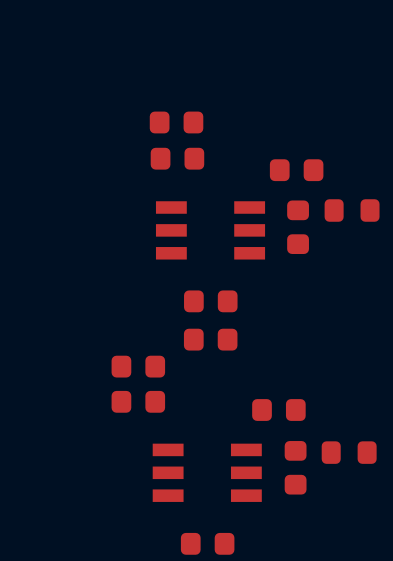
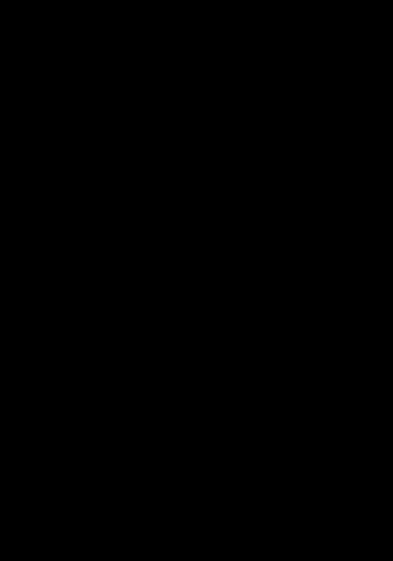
part: (176, 122) -> none
part: (177, 158) -> none
part: (296, 170) -> none
part: (352, 210) -> none
part: (298, 227) -> none
part: (210, 230) -> none
part: (210, 301) -> none
part: (210, 339) -> none
part: (138, 366) -> none
part: (138, 401) -> none
part: (278, 410) -> none
part: (349, 452) -> none
part: (295, 467) -> none
part: (207, 472) -> none
part: (207, 543) -> none

